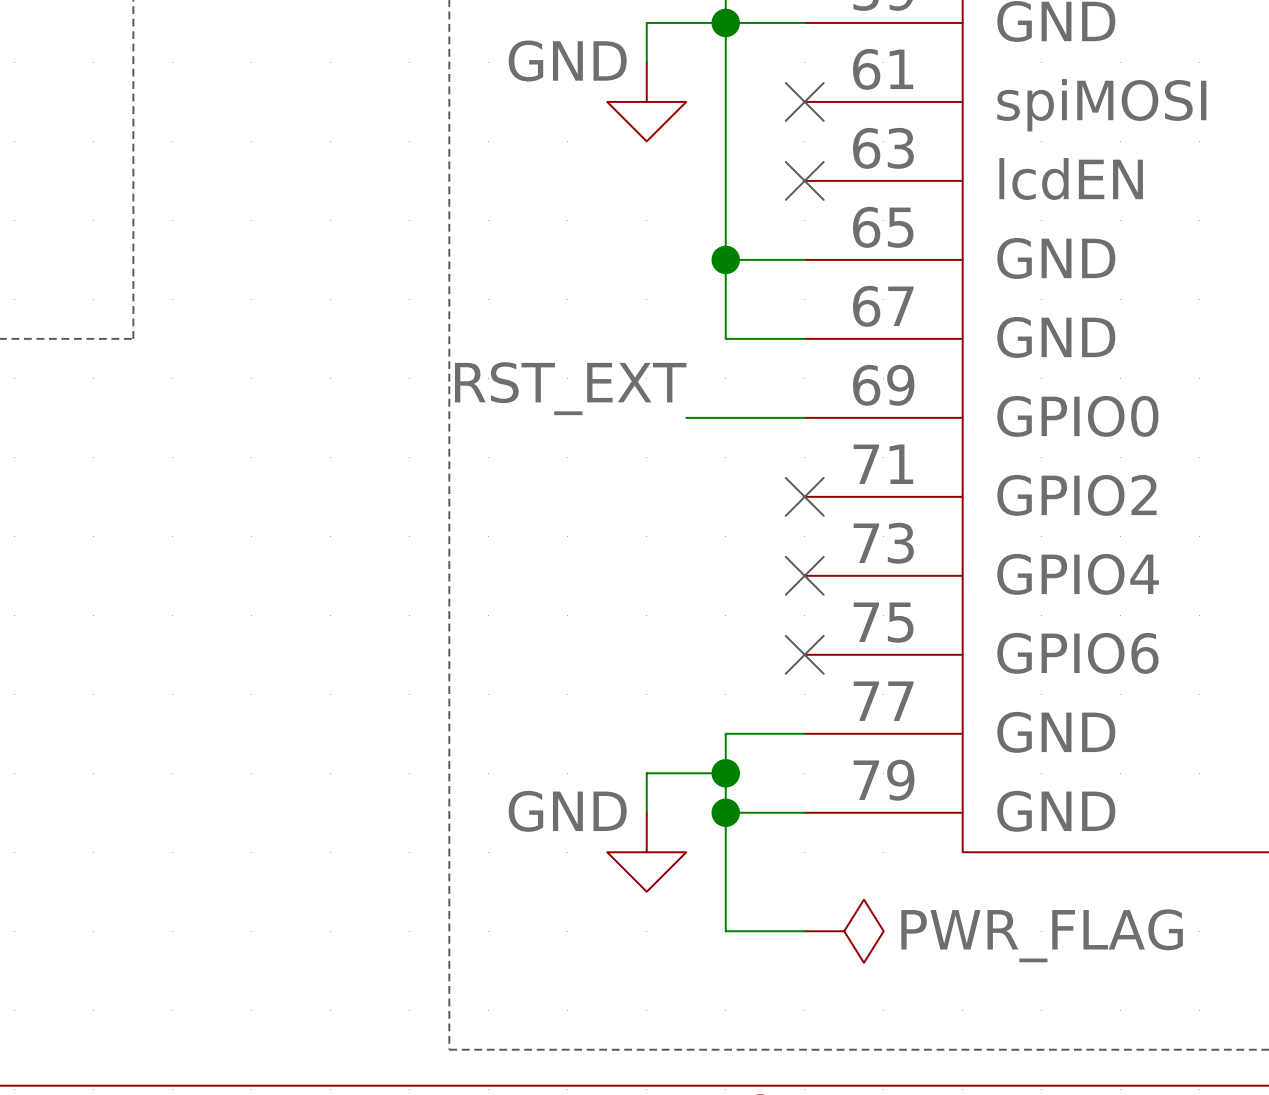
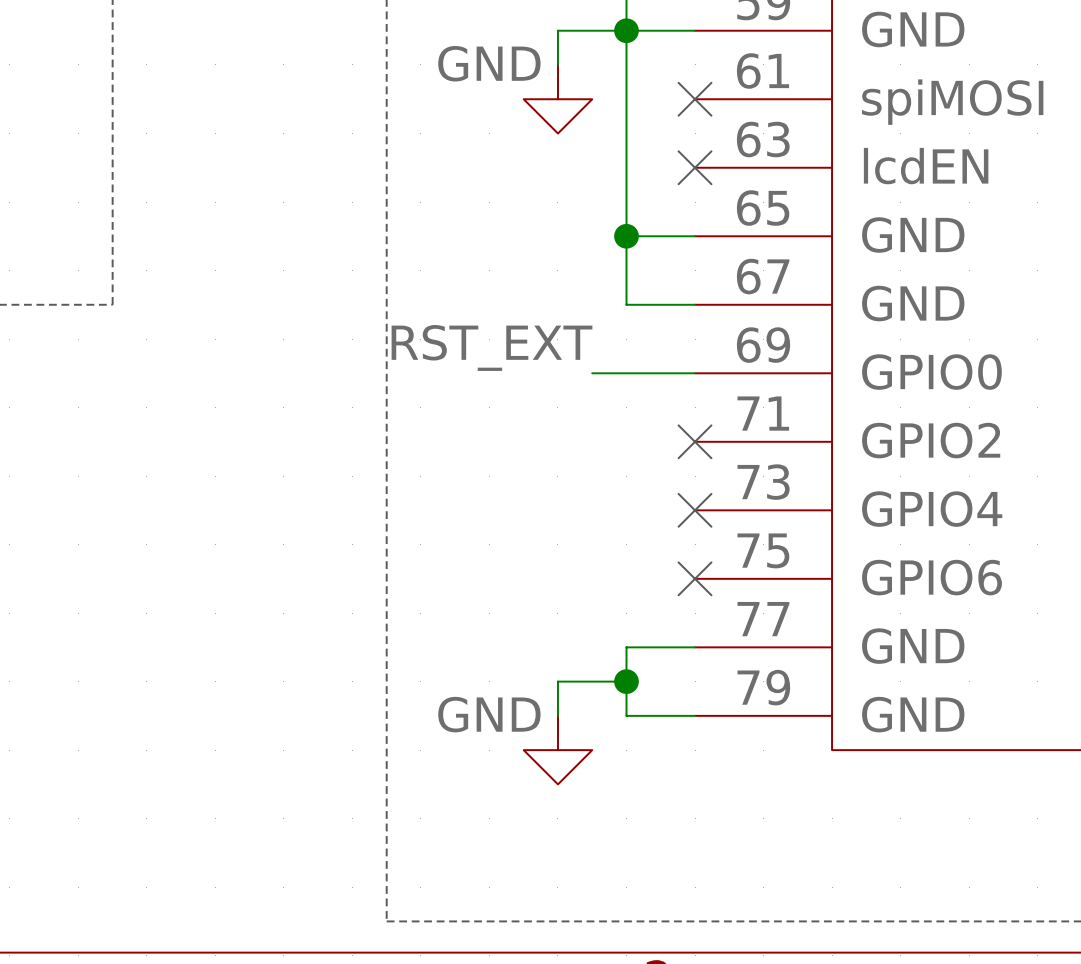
wire: (725, 812) (725, 931) (804, 931) -> none
junction: (725, 812) -> none
power symbol: PWR_FLAG (844, 931) -> none

